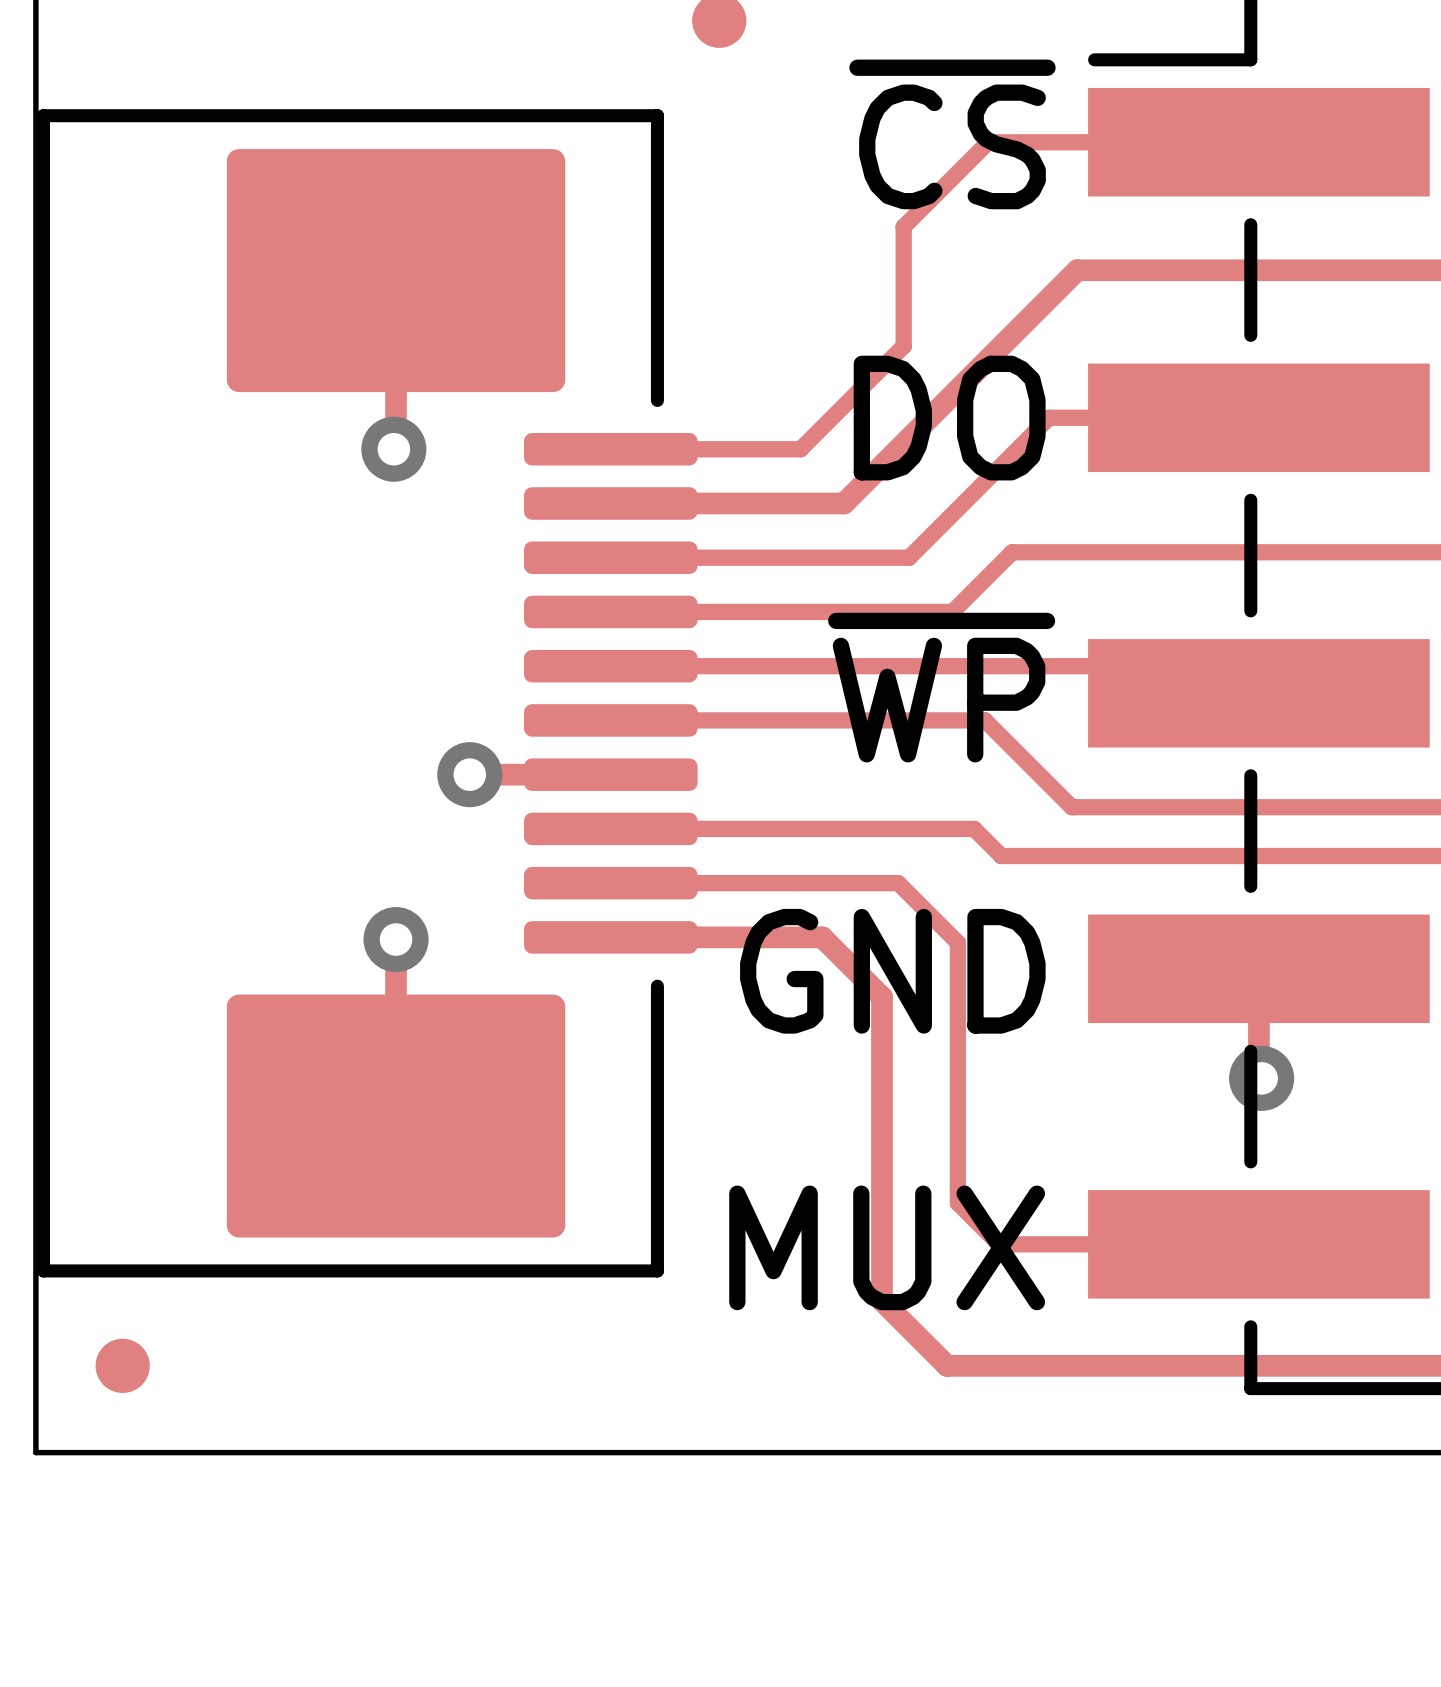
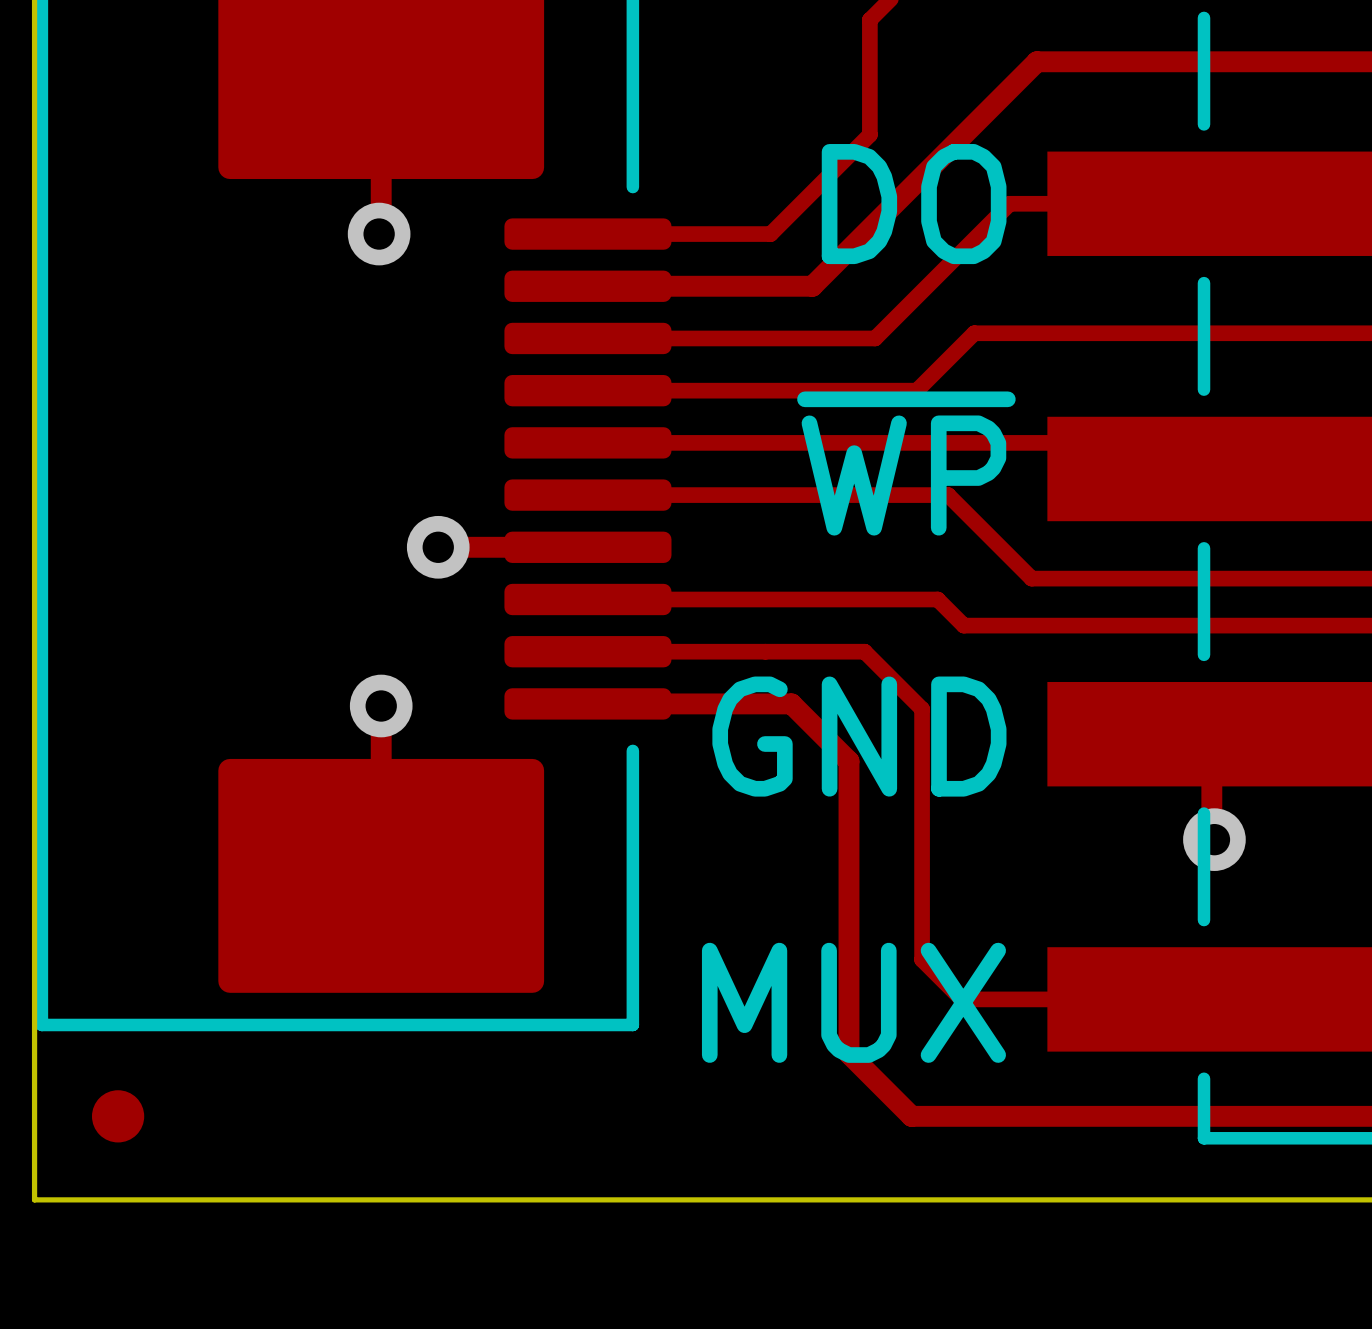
via position: (469, 774) -> (438, 547)

